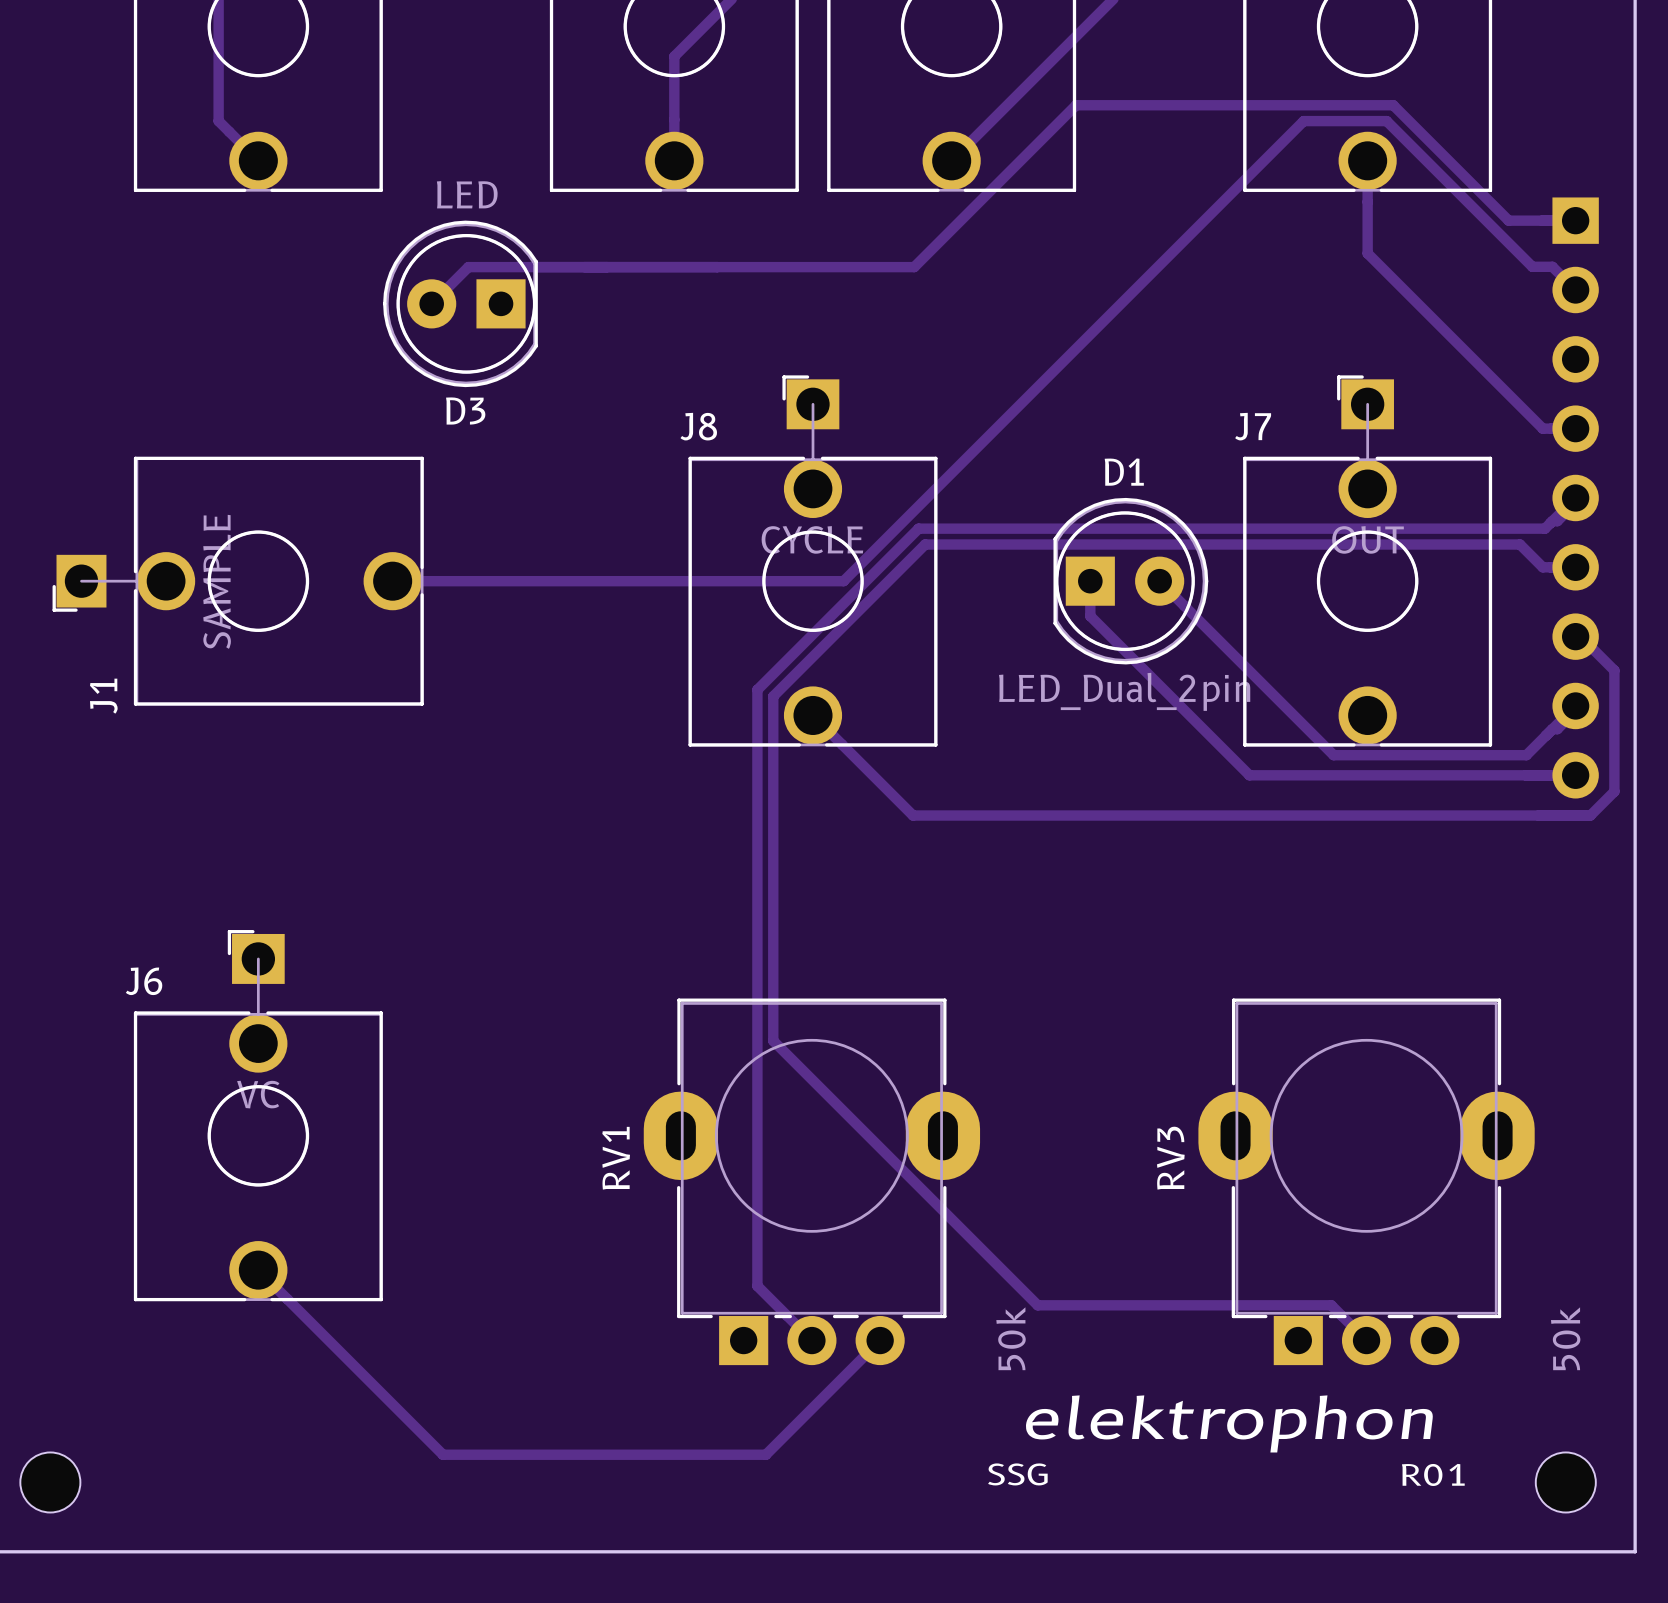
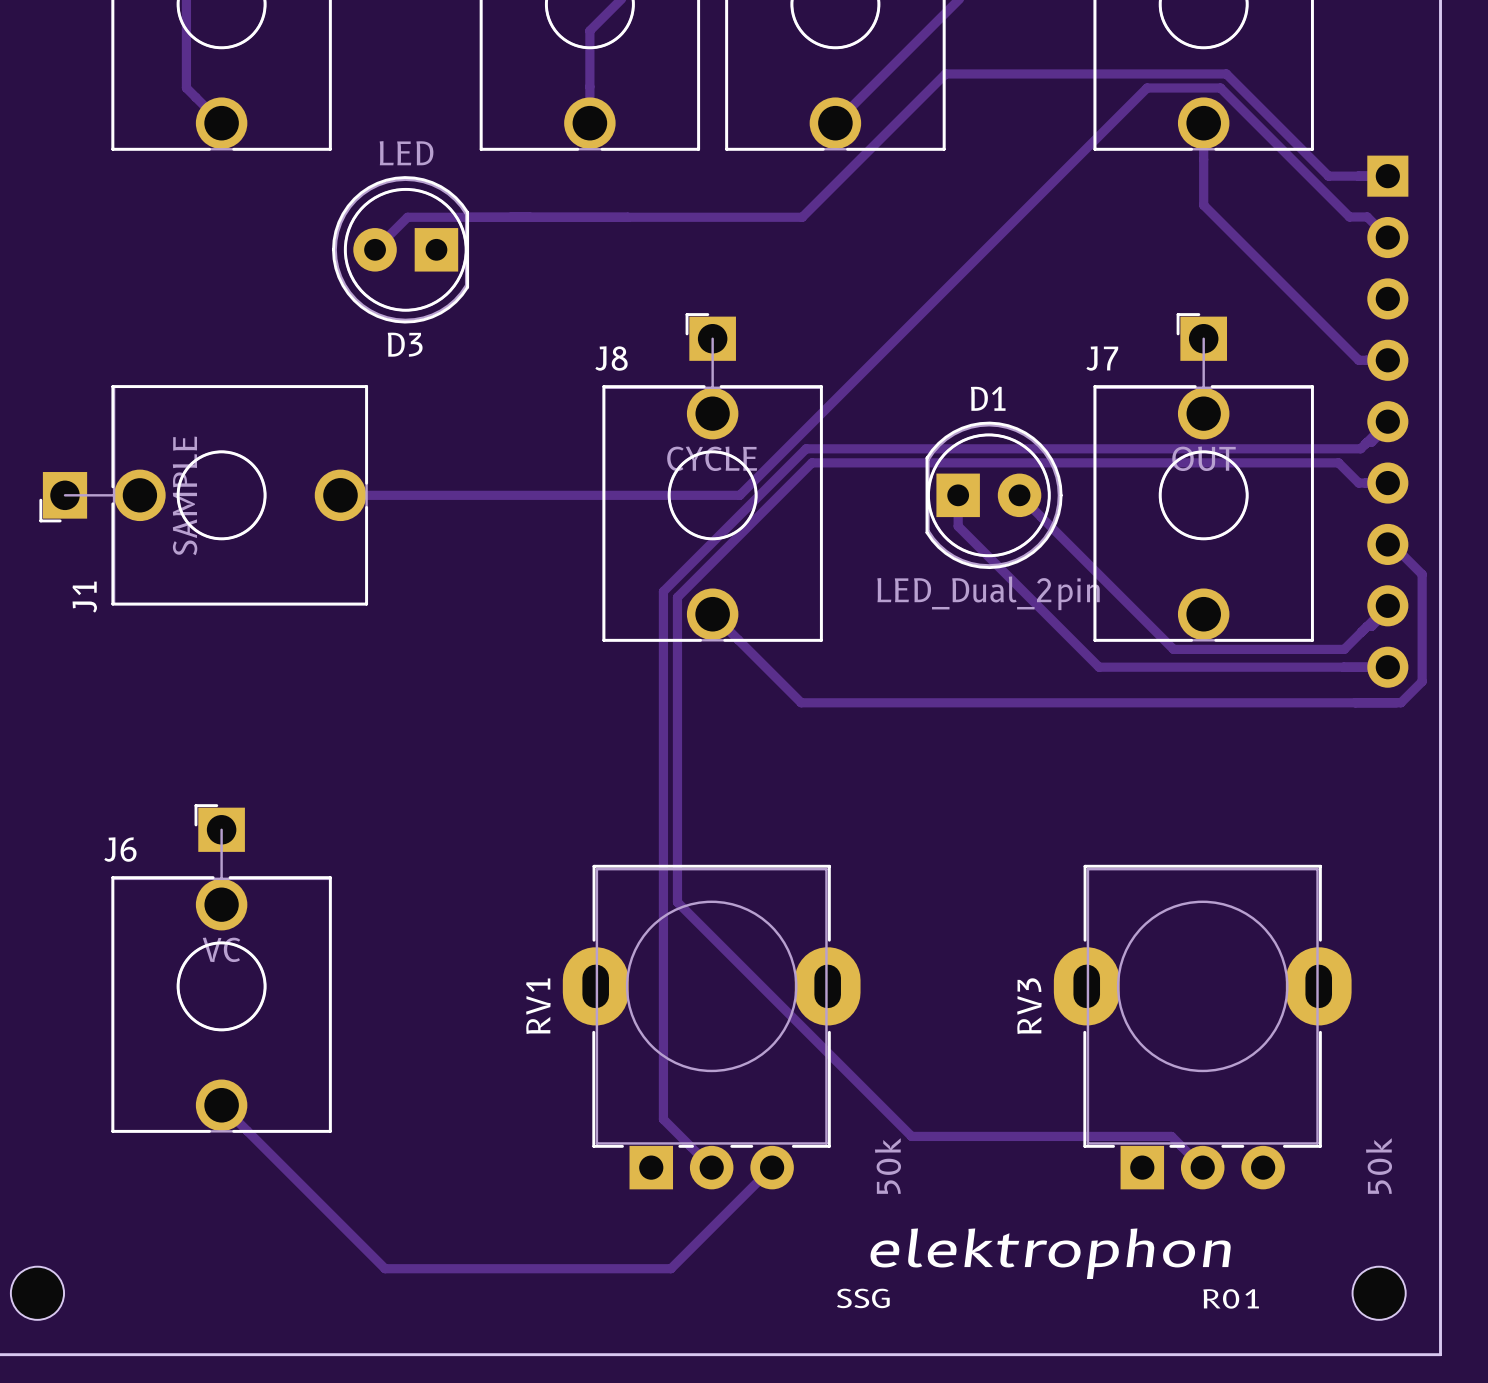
drawing position: (1226, 1440) -> (1047, 1268)

